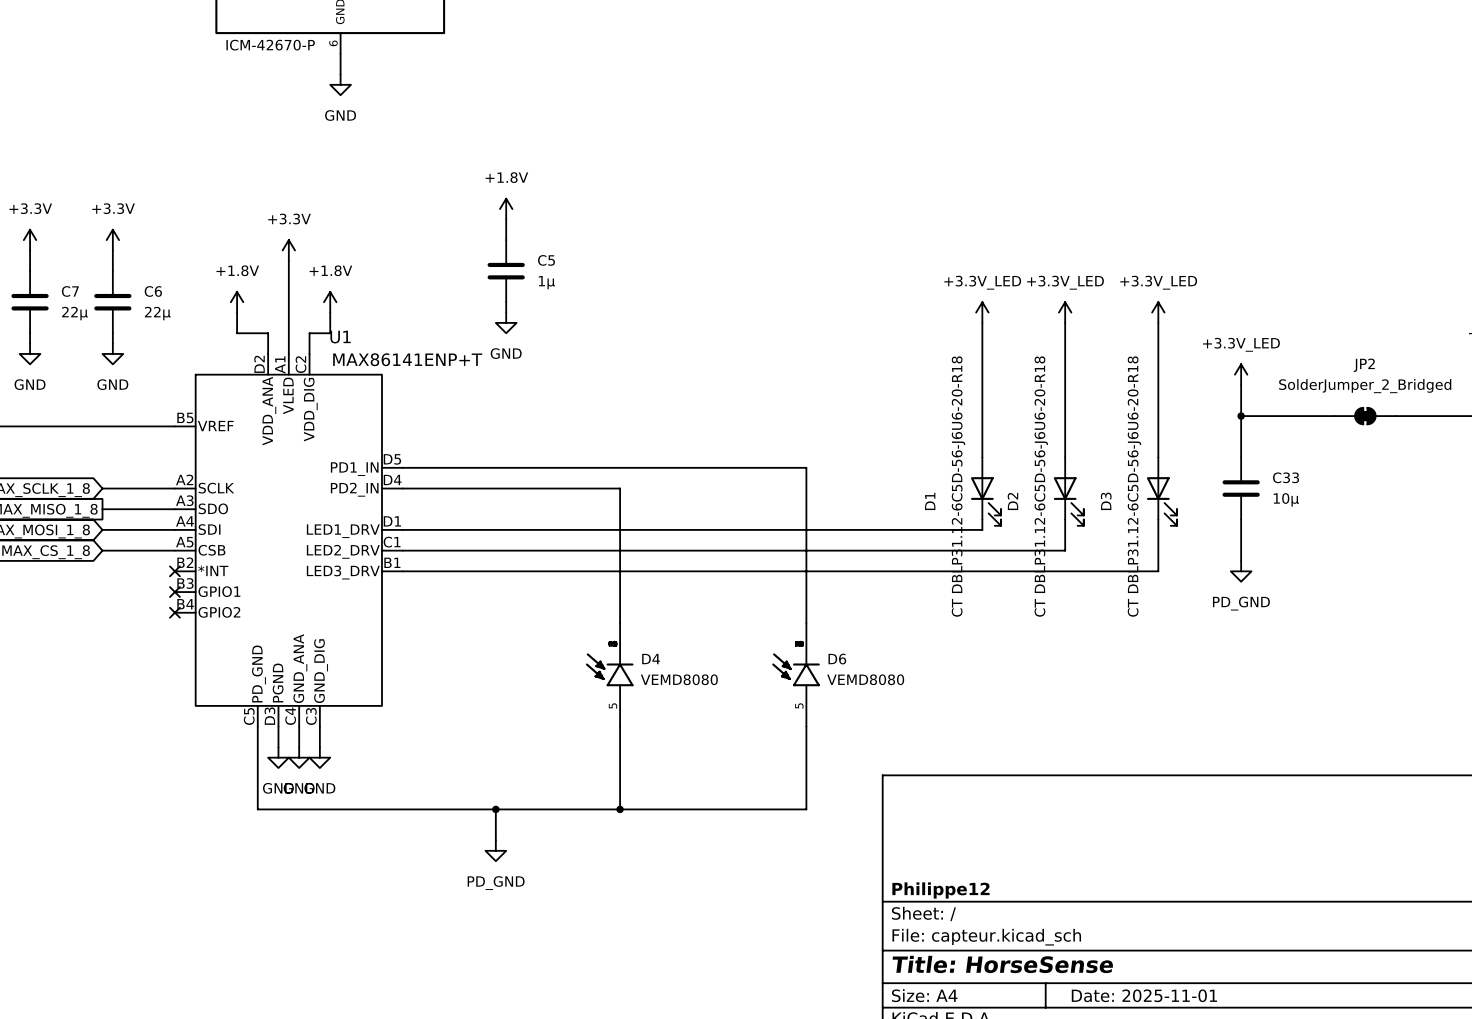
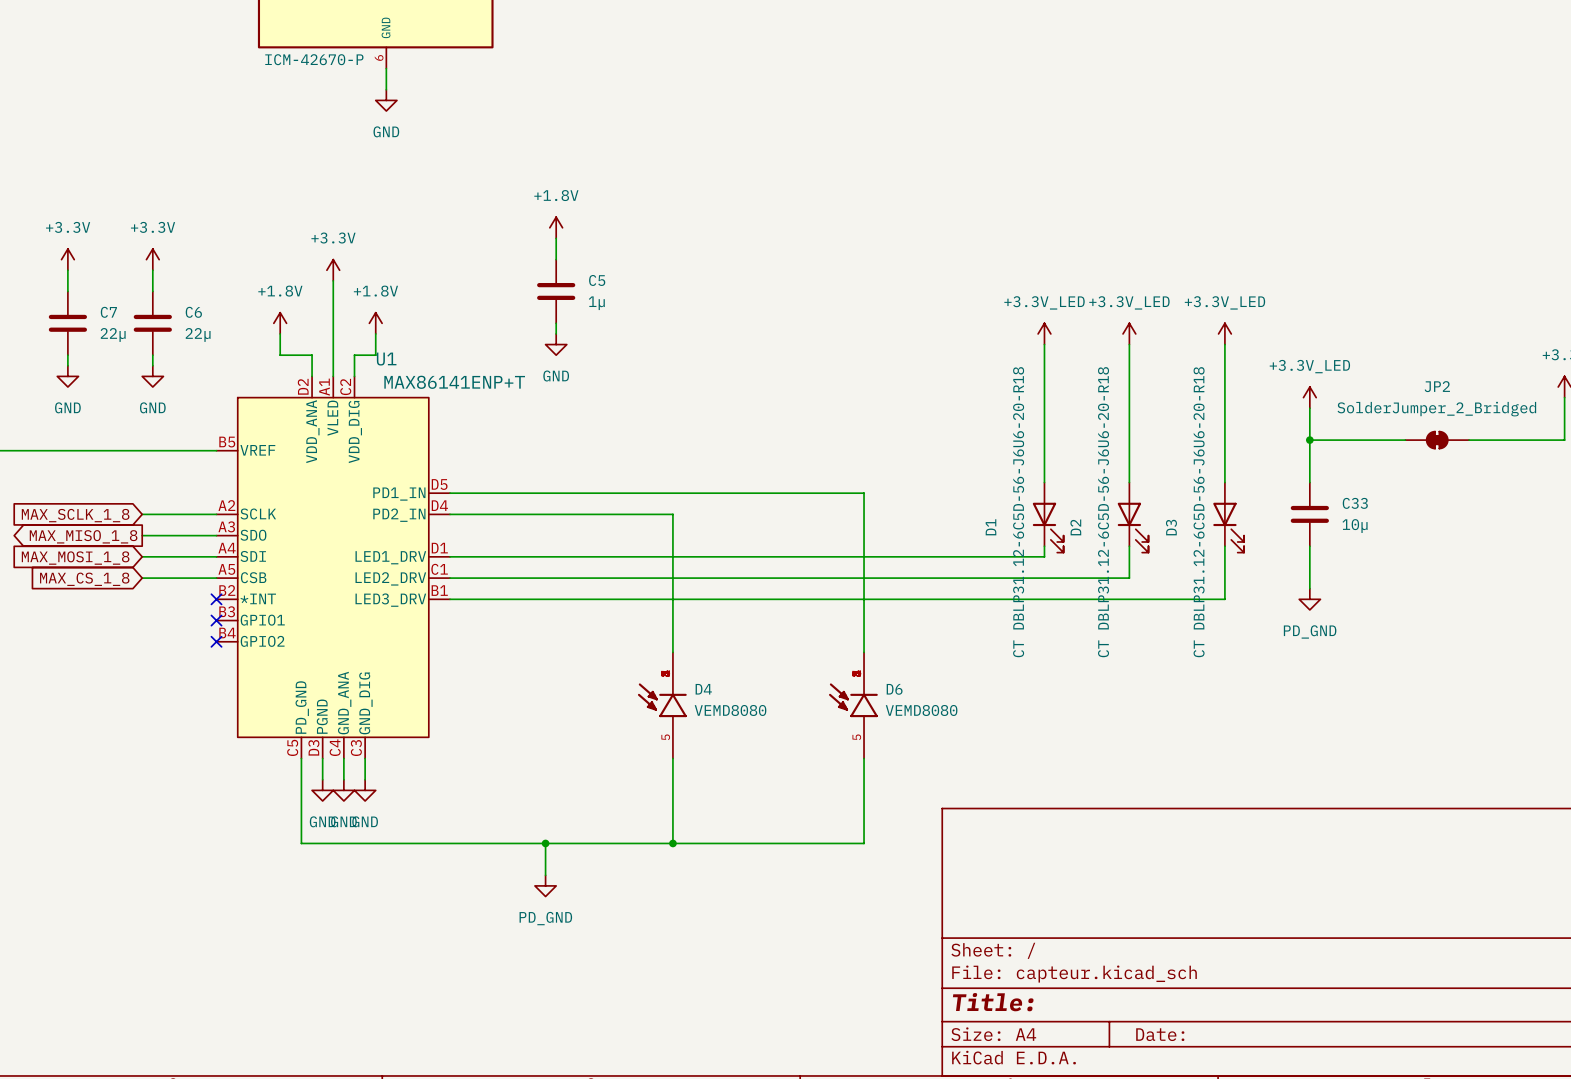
title block: Philippe12 (940, 890) -> none
title block: Title: HorseSense (1002, 964) -> Title: (993, 1002)
title block: Date: 2025-11-01 (1144, 995) -> Date: (1160, 1034)

